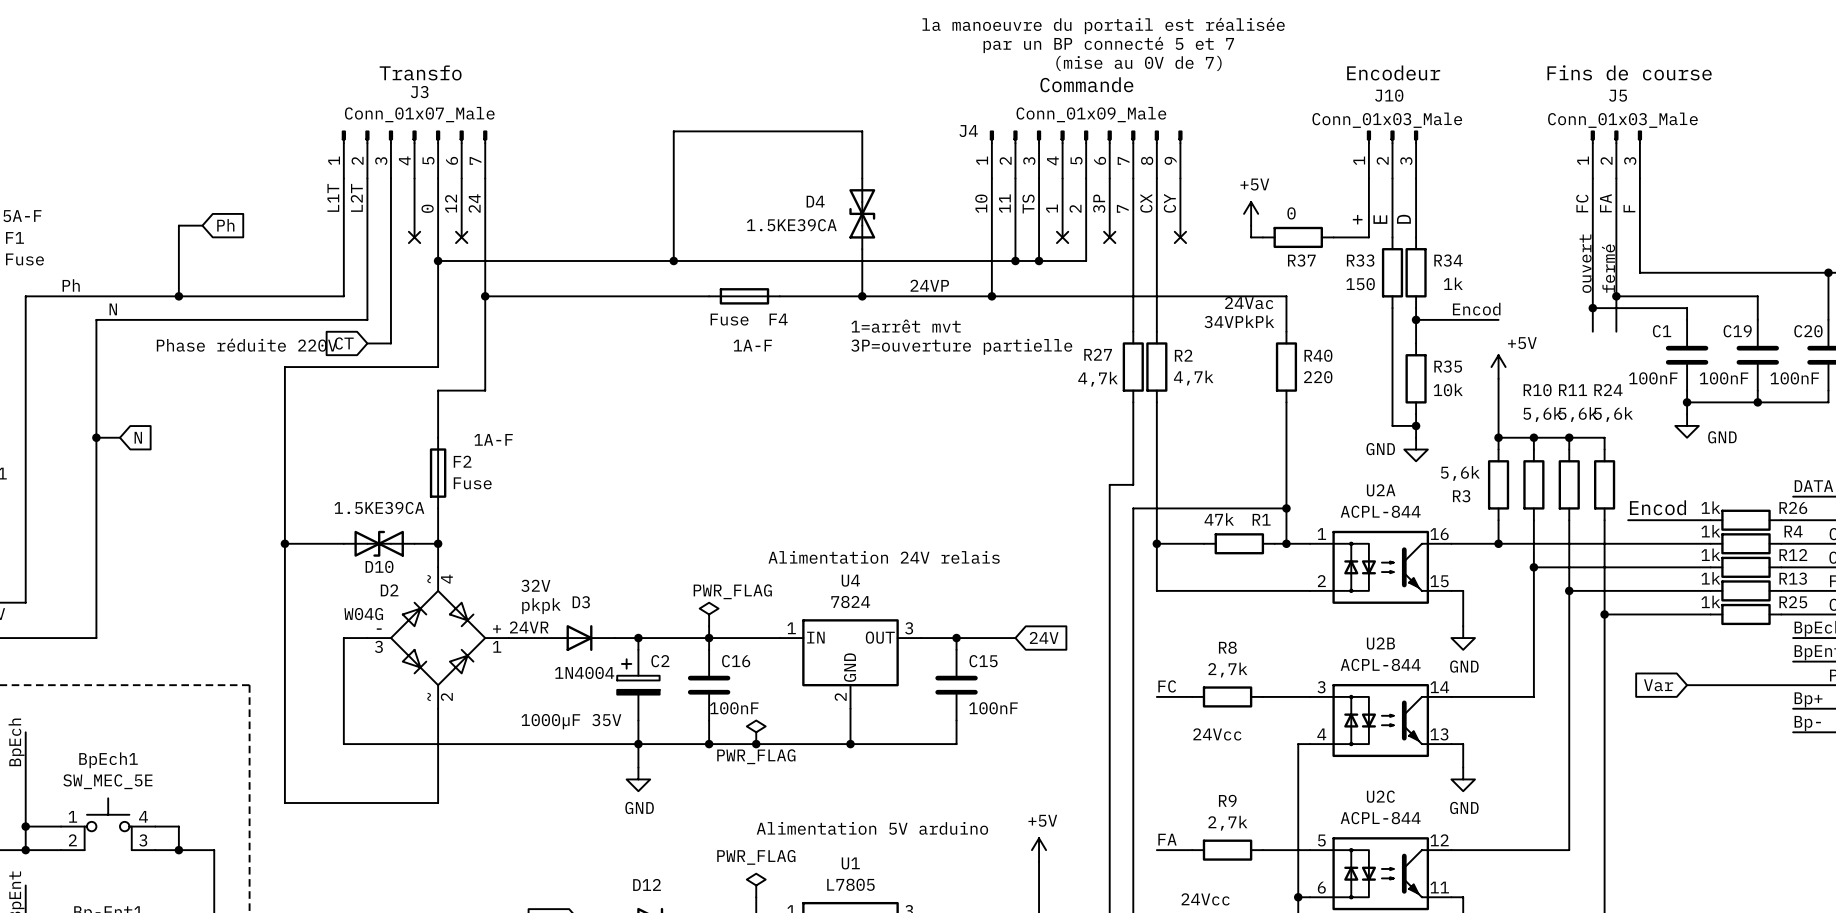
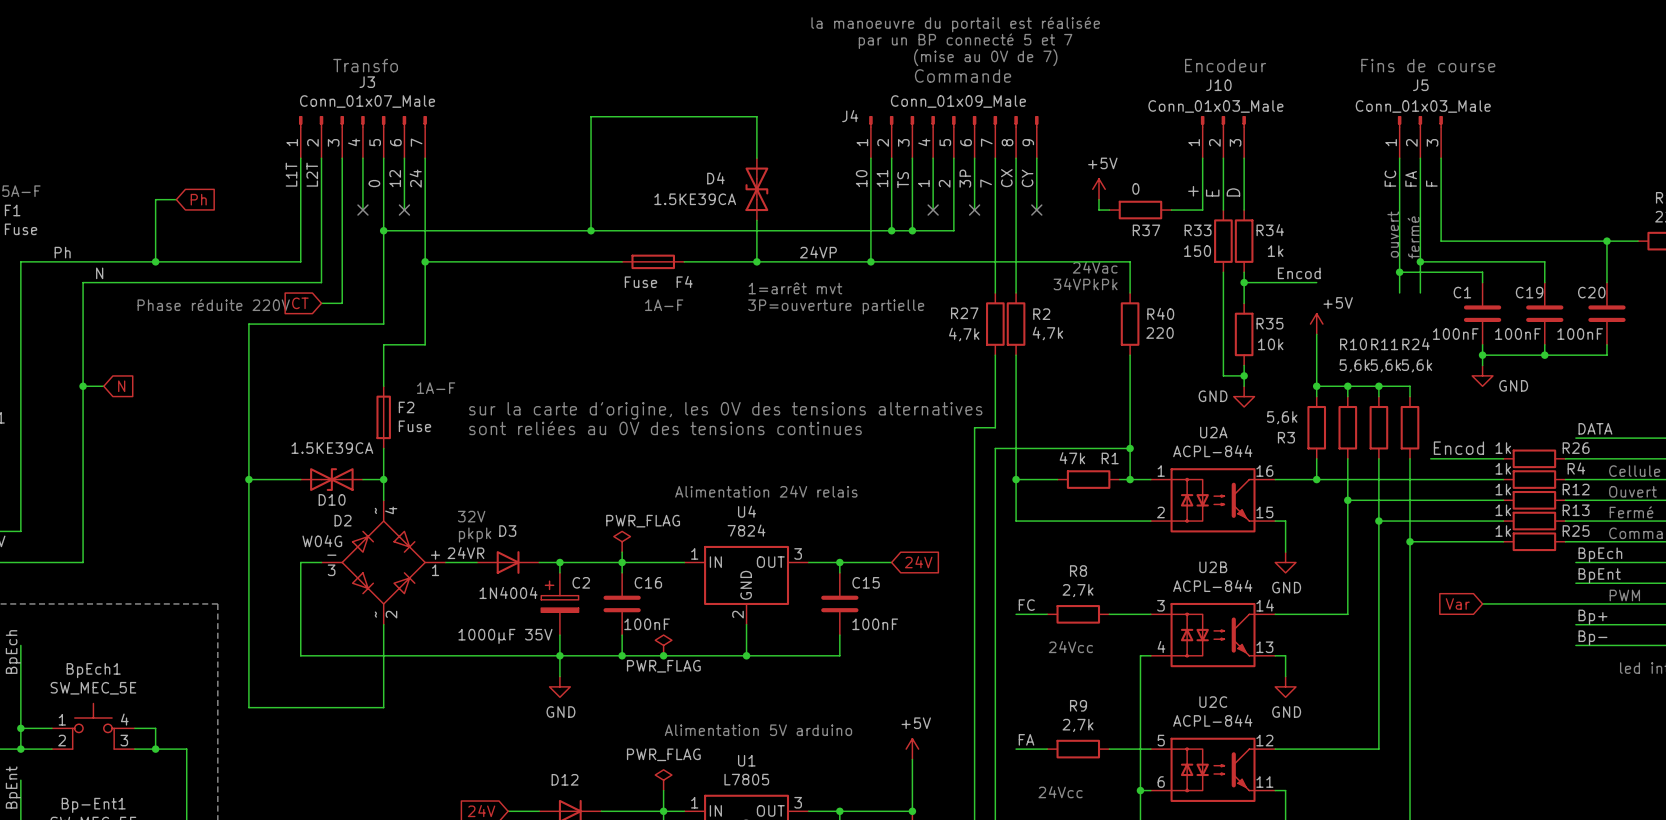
text: none -> sur la carte d'origine, les 0V des tensions alternatives (725, 410)
text: none -> sont reliées au 0V des tensions continues (665, 428)

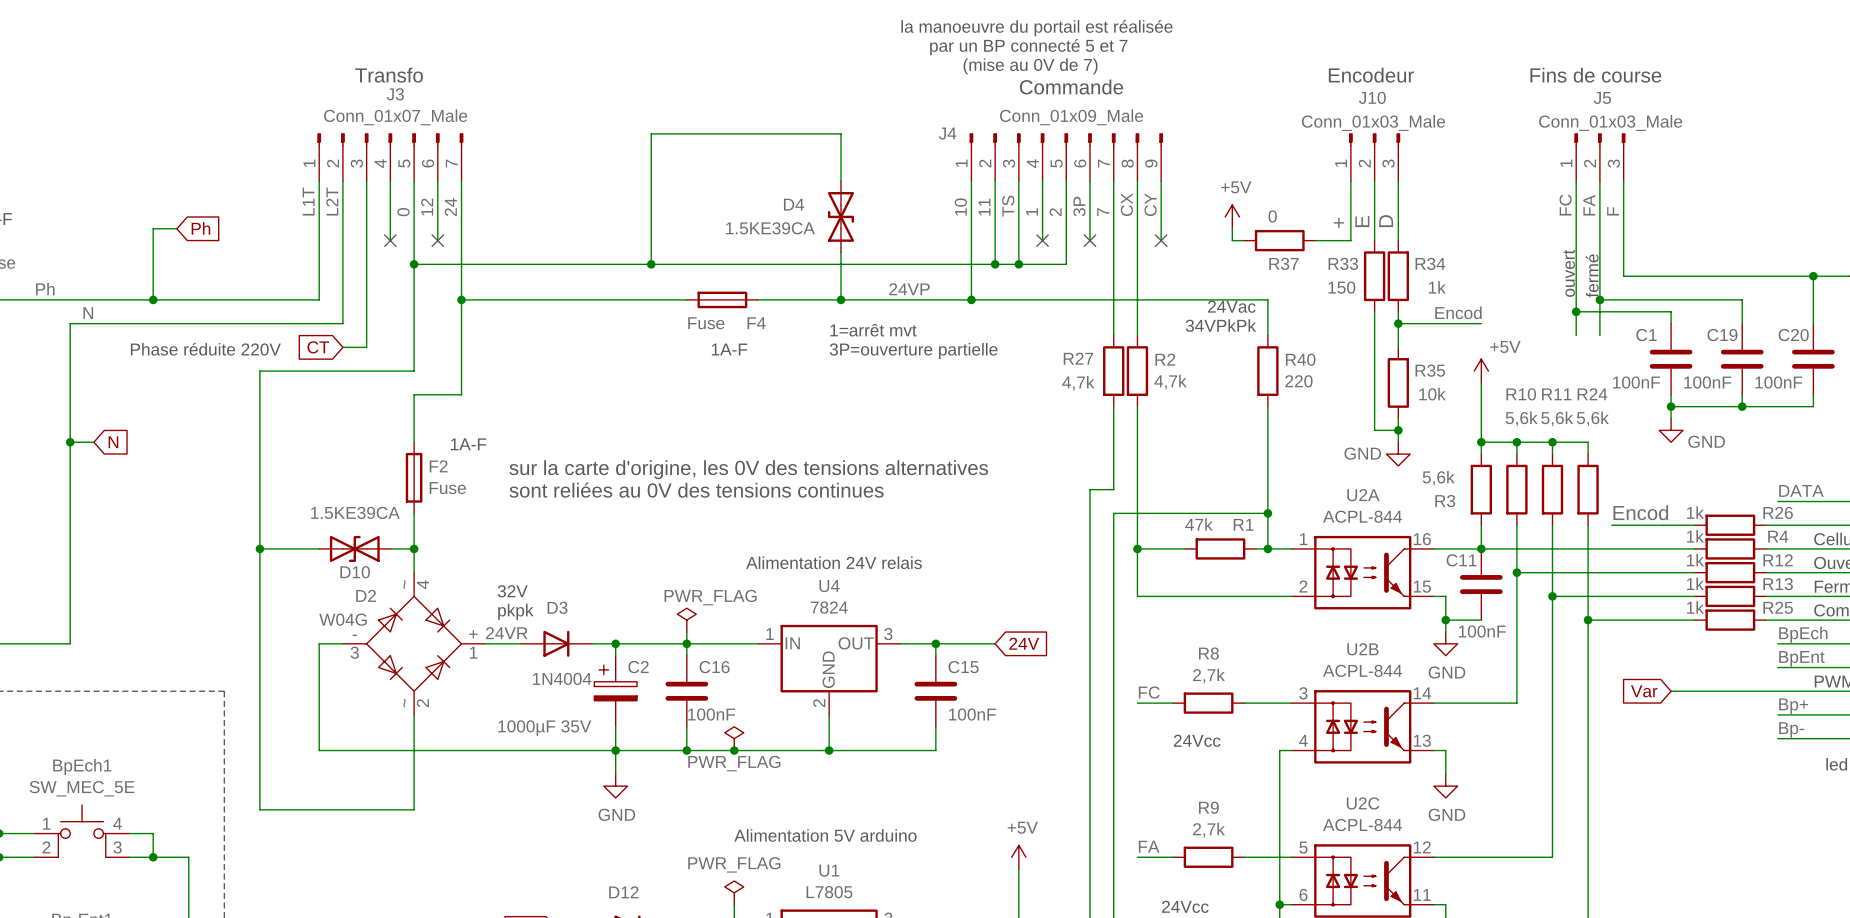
C11: none -> 100nF (1481, 584)
wire: none -> (1445, 620) (1481, 620)
junction: none -> (1445, 620)

